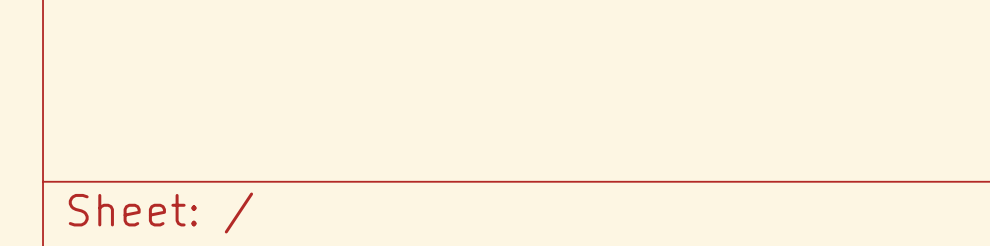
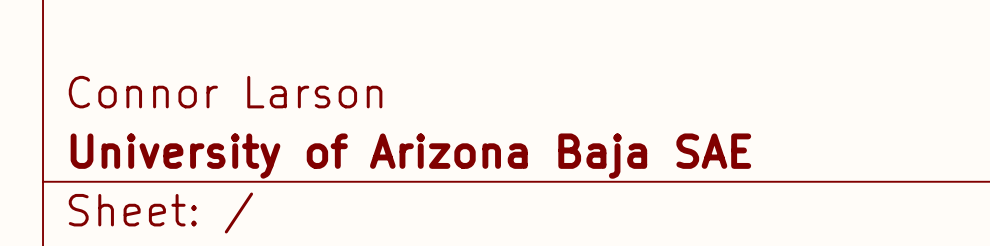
title block: none -> Connor Larson (225, 92)
title block: none -> University of Arizona Baja SAE (410, 156)

